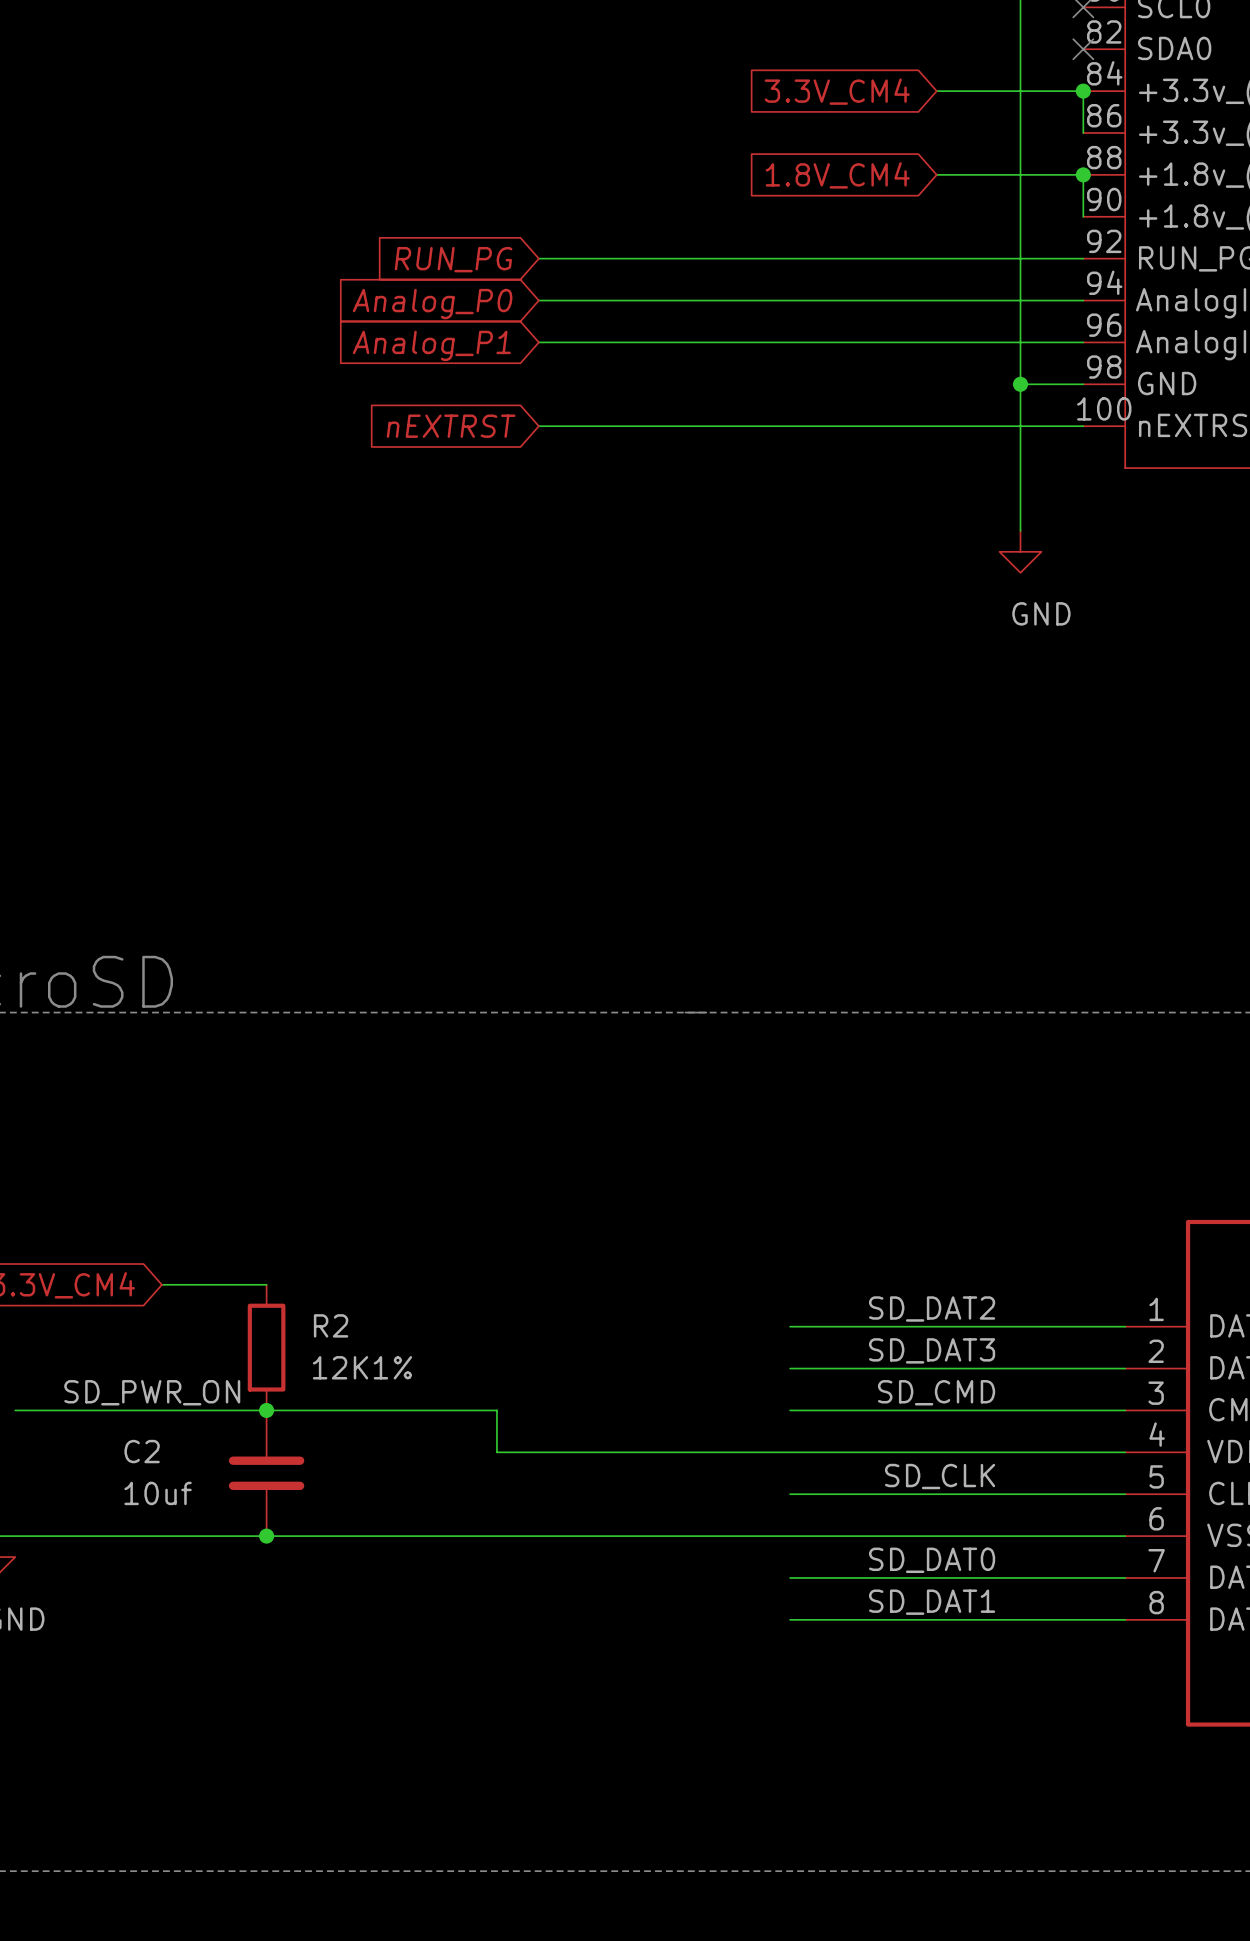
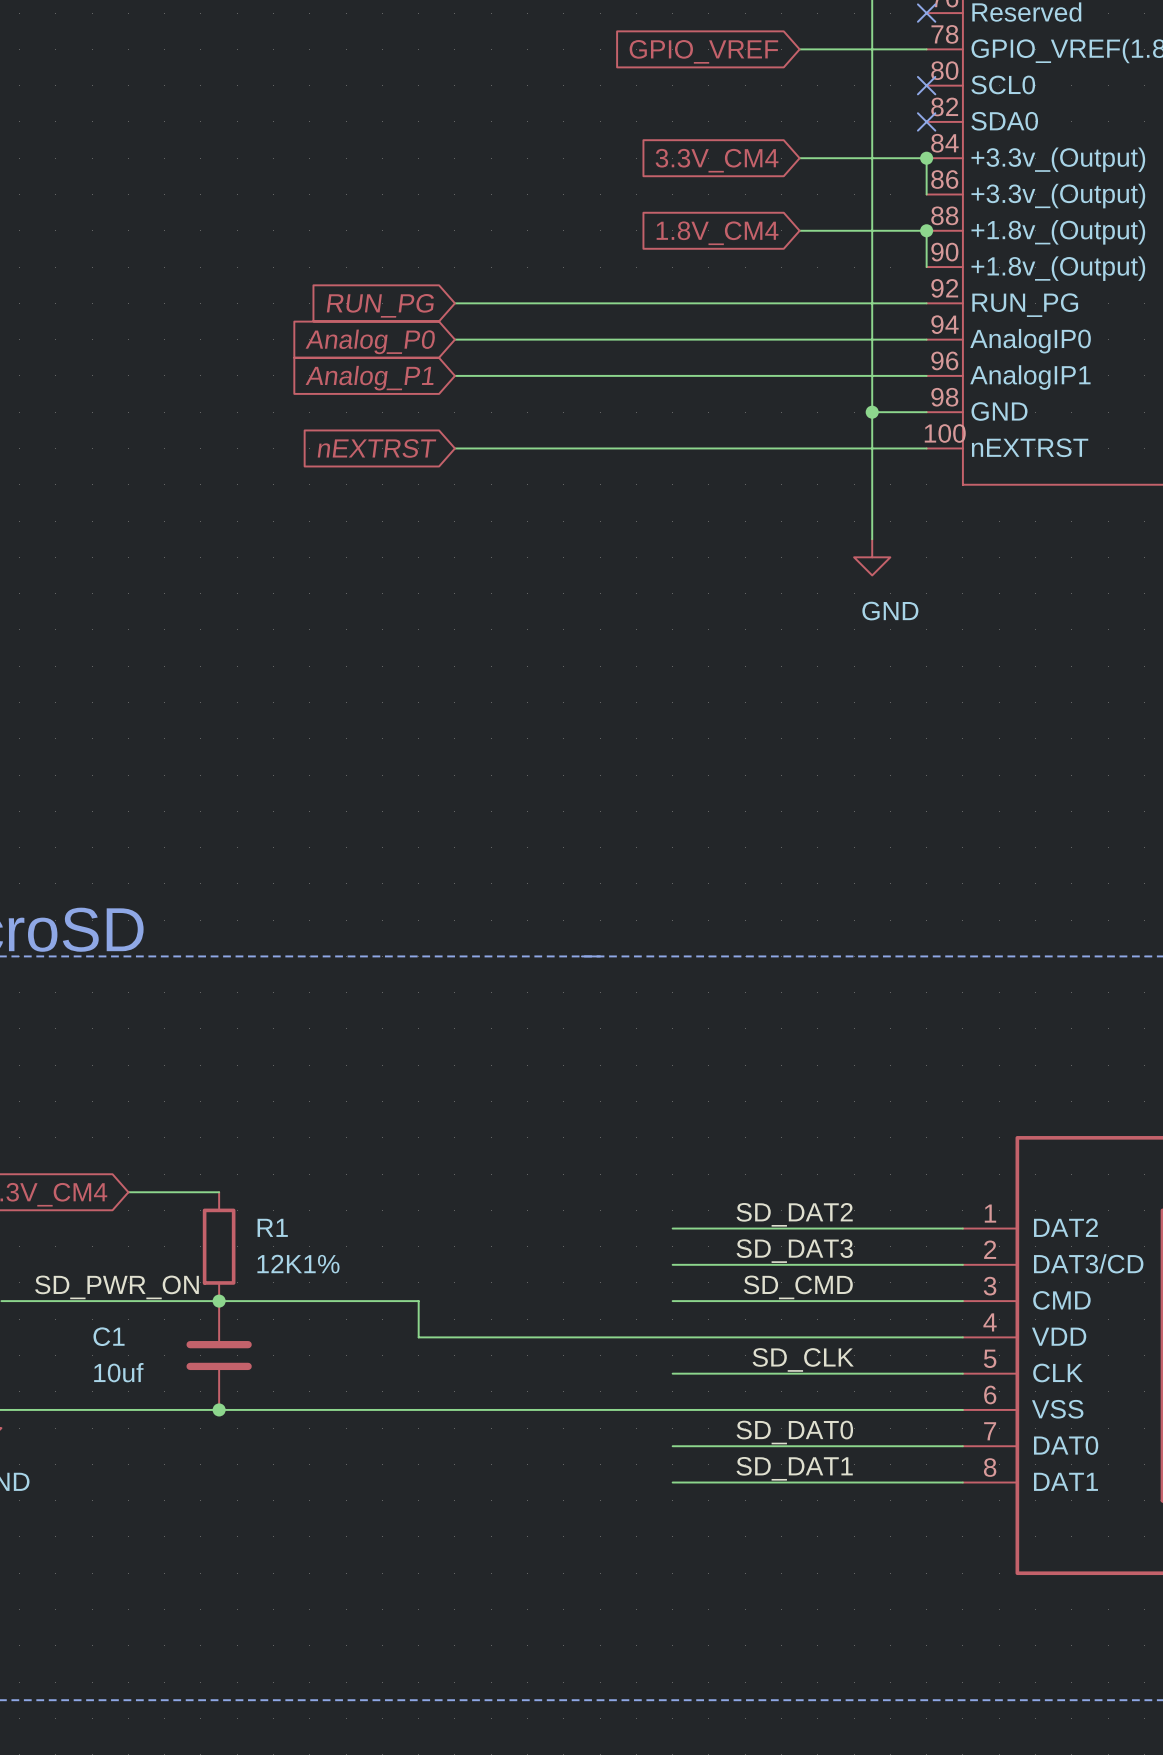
R2 name: R2 (331, 1325) -> R1 (272, 1227)
C2 name: C2 (142, 1451) -> C1 (109, 1336)

